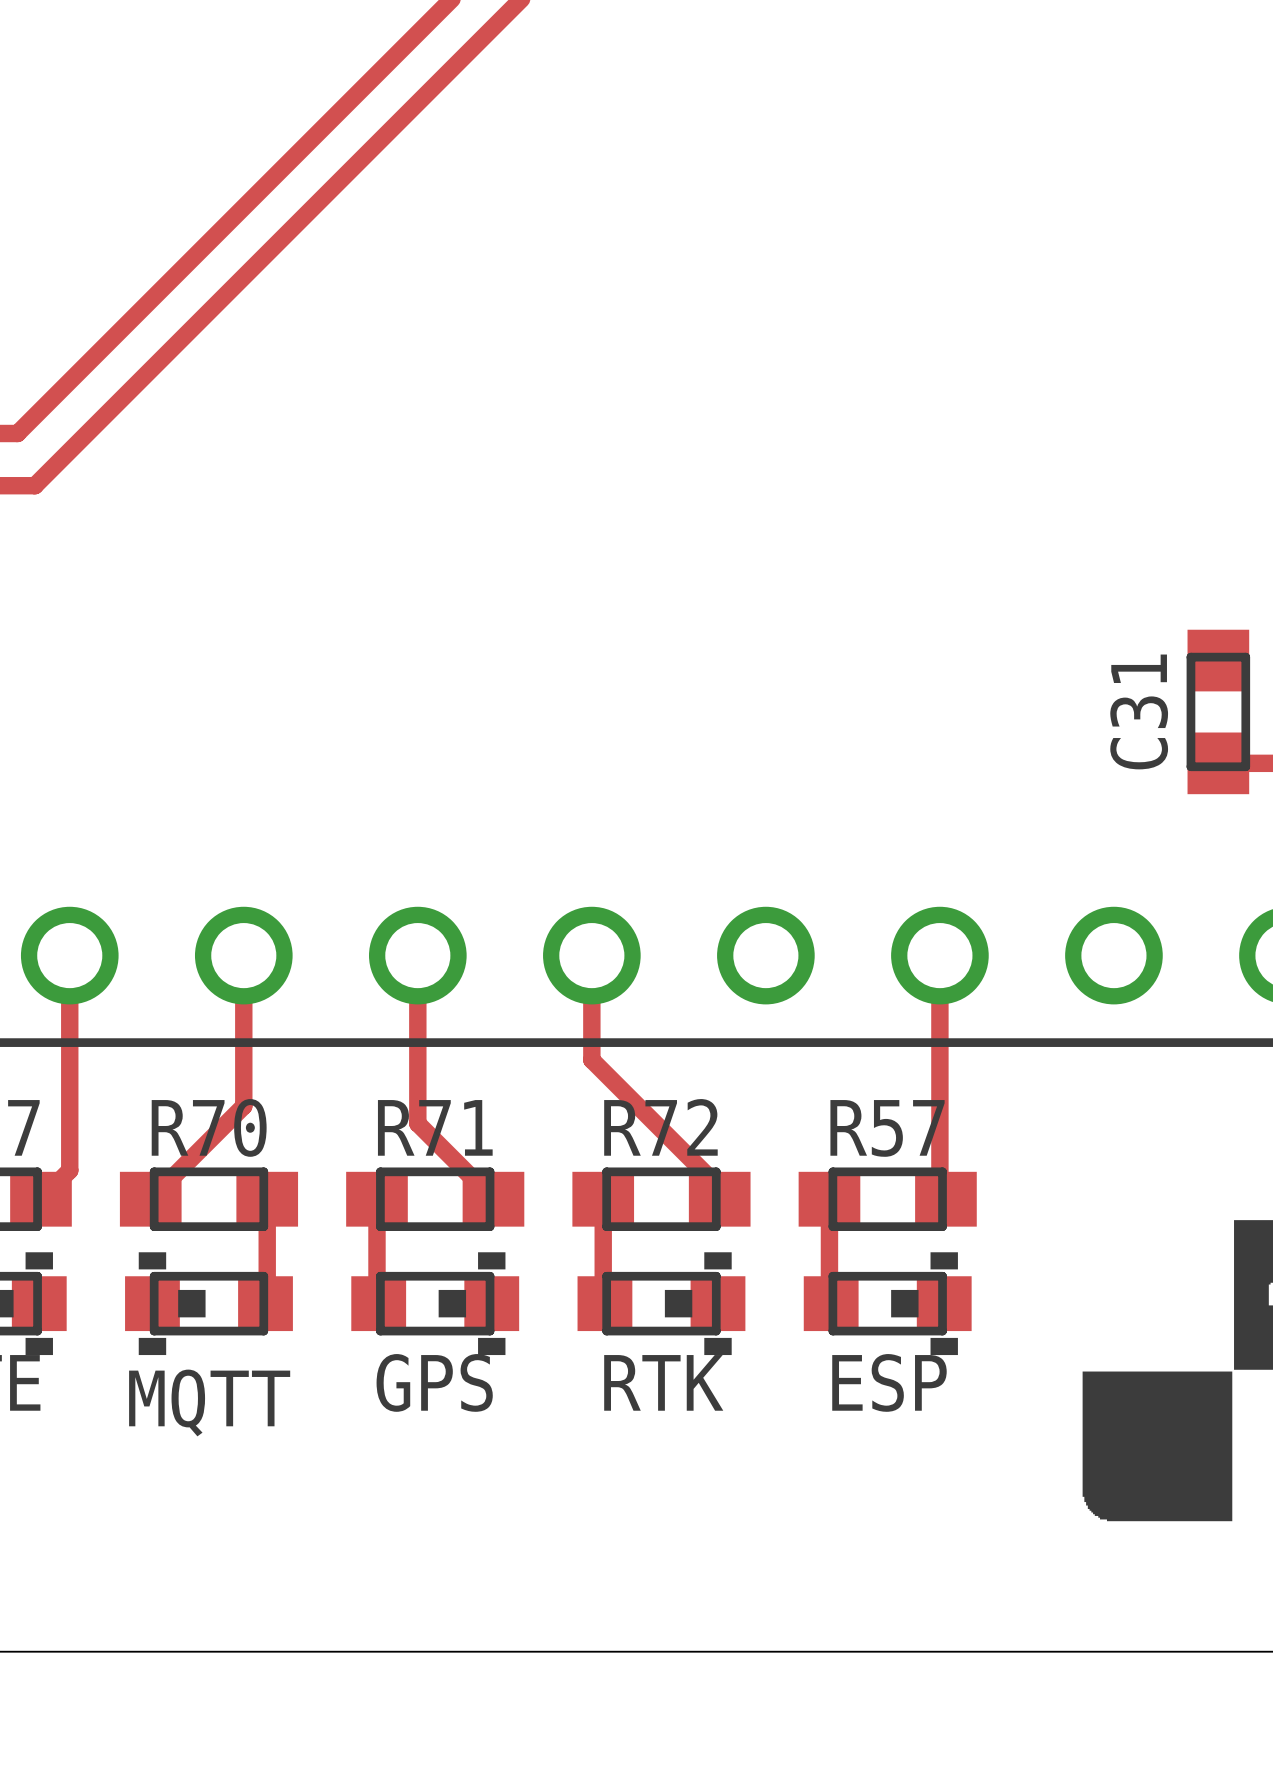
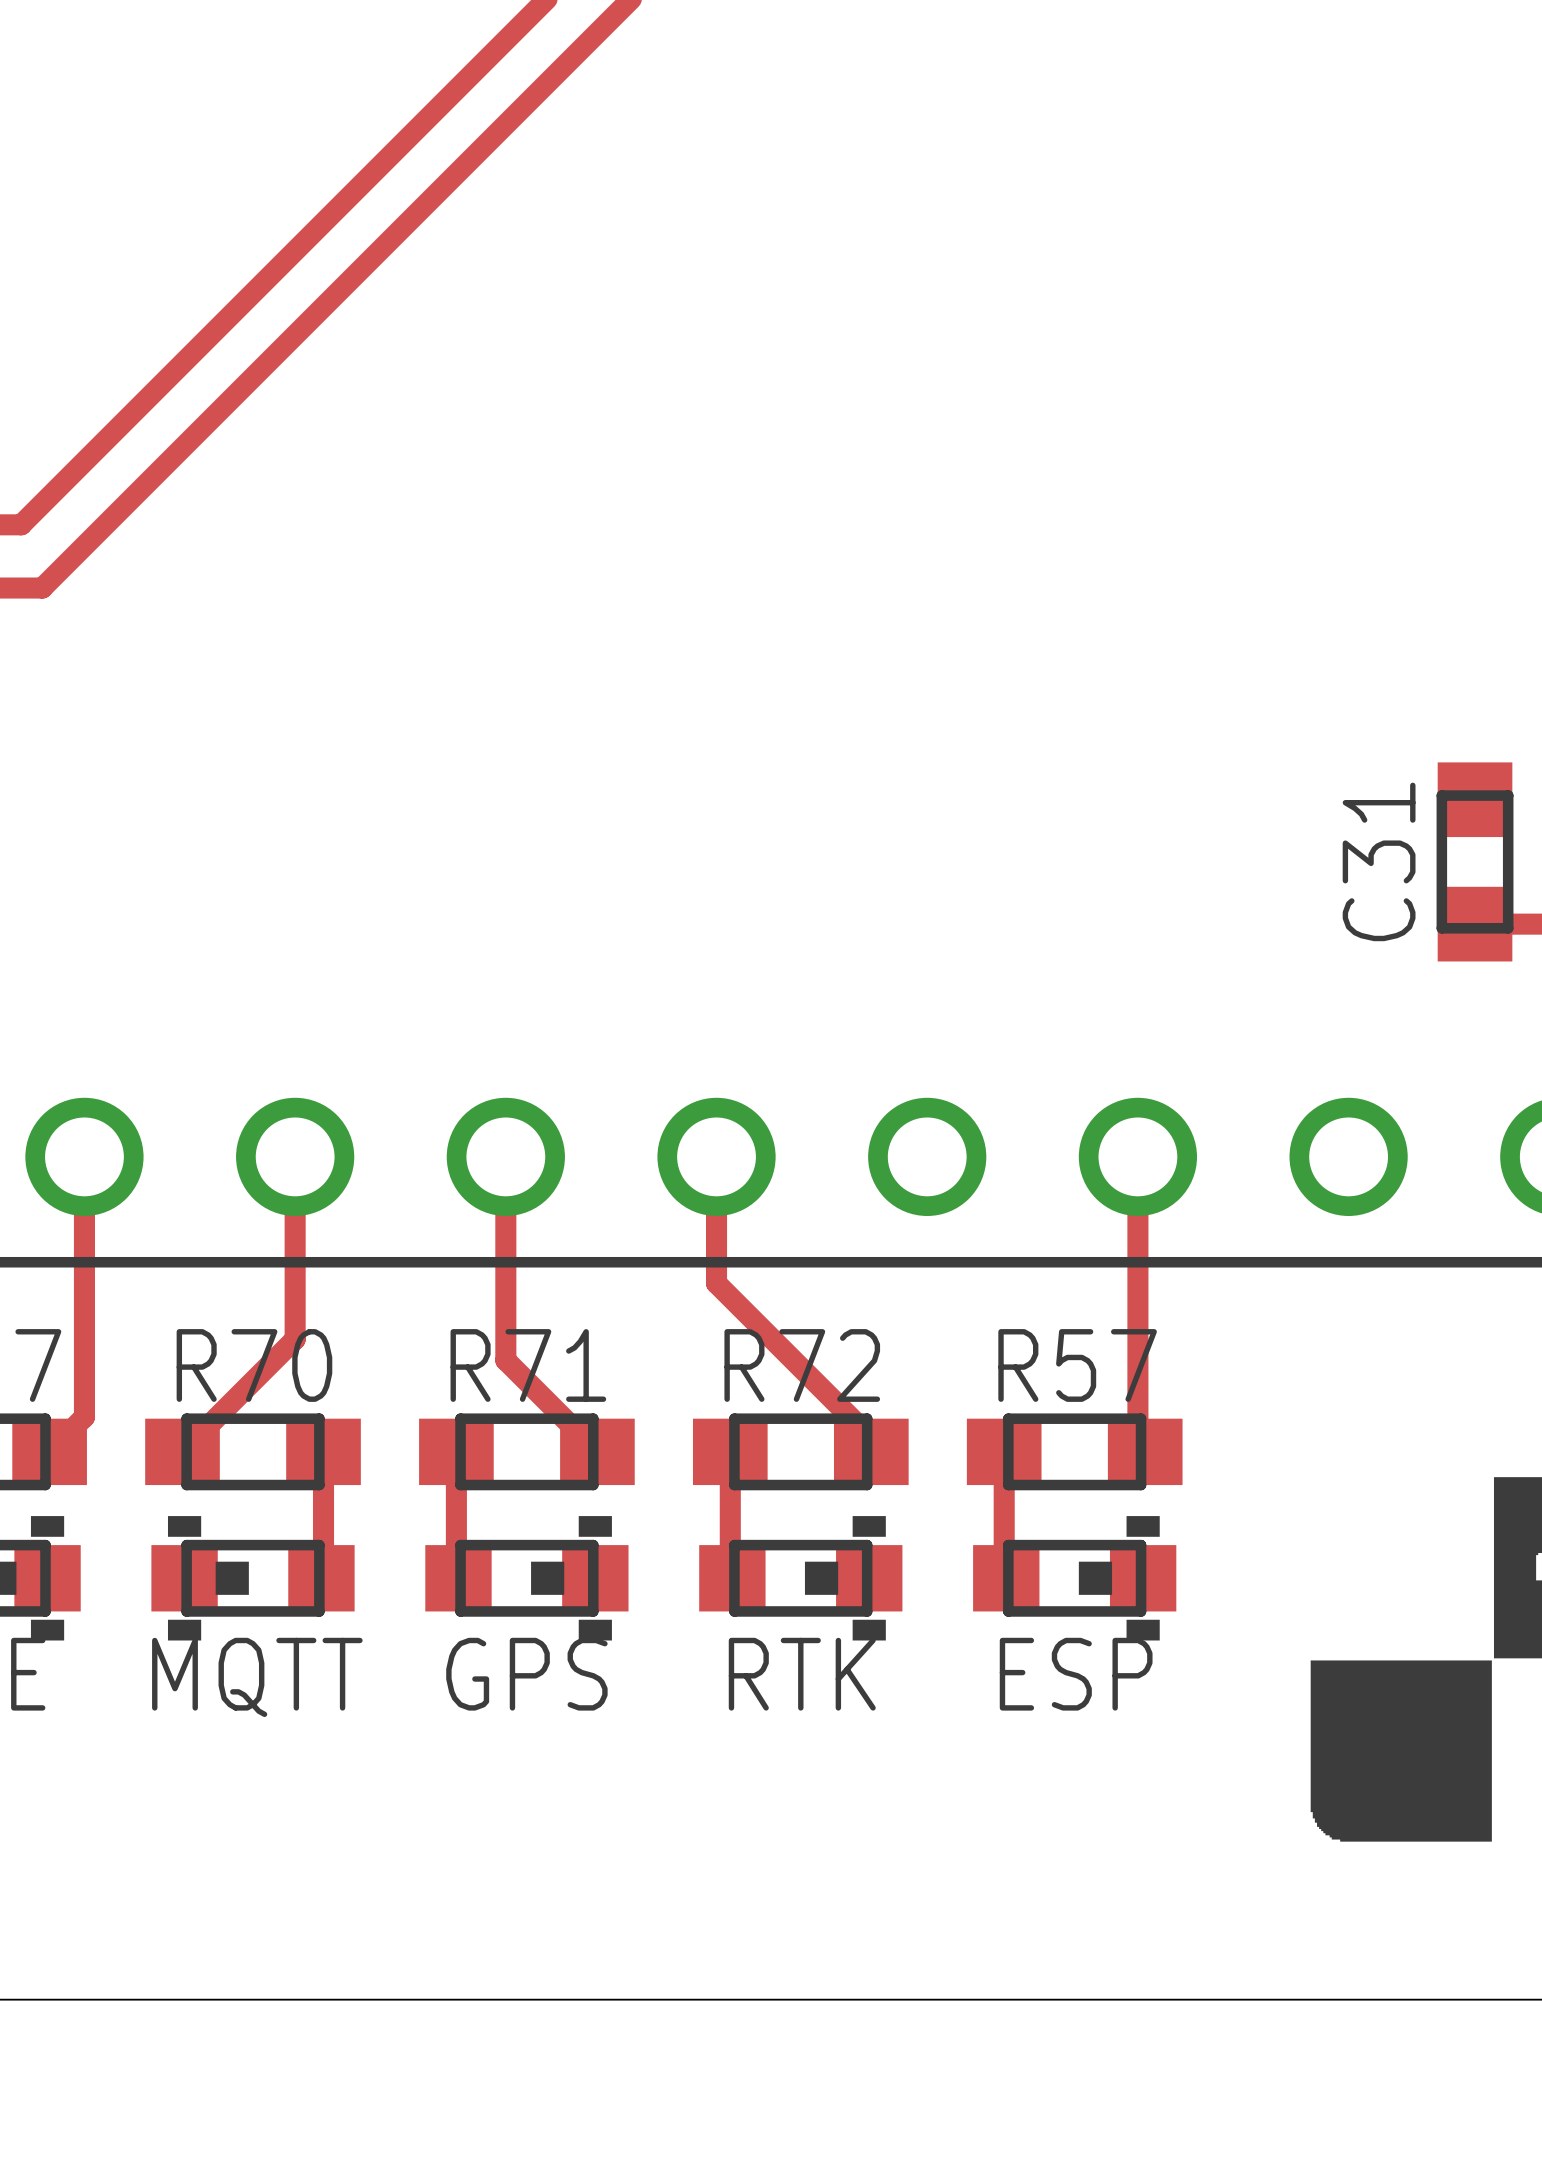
MQTT name position: MQTT (209, 1402) -> MQTT (257, 1677)

